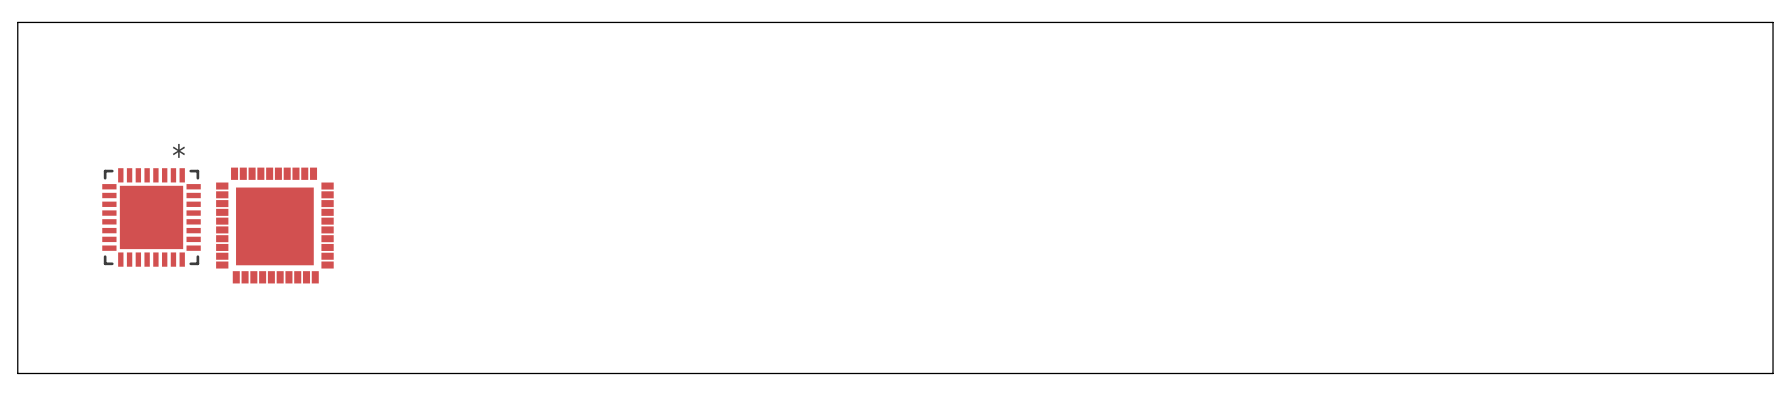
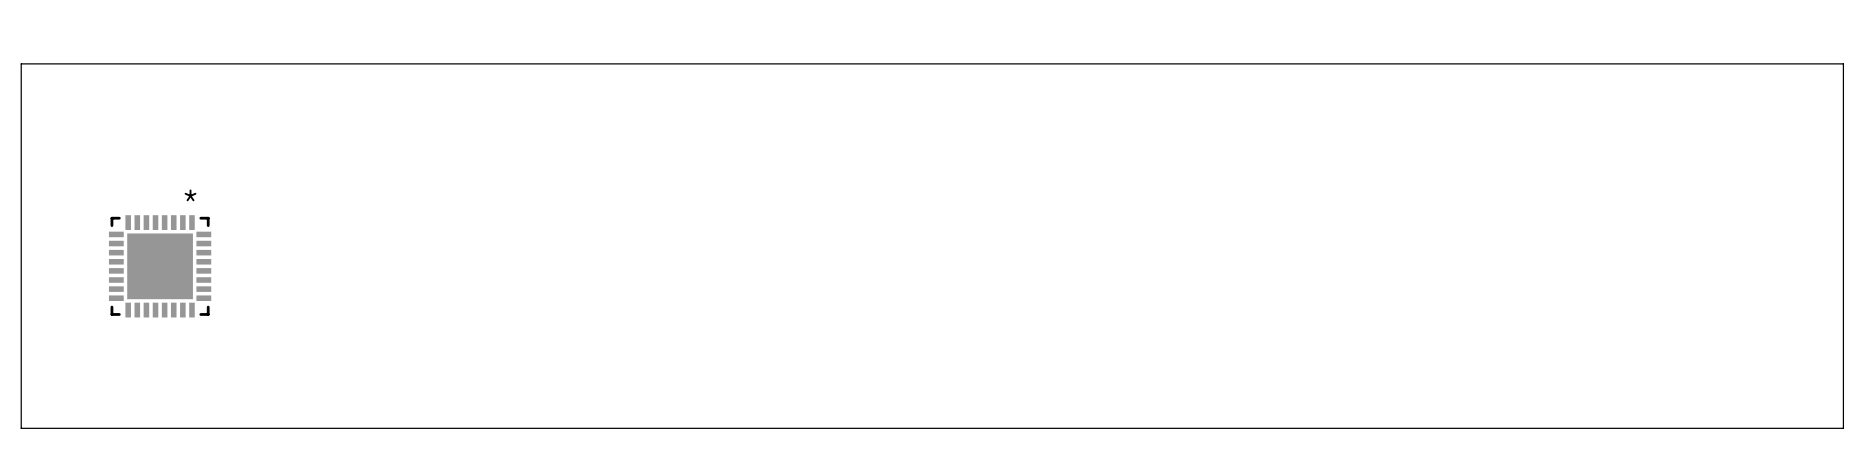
part: (274, 225) -> none

